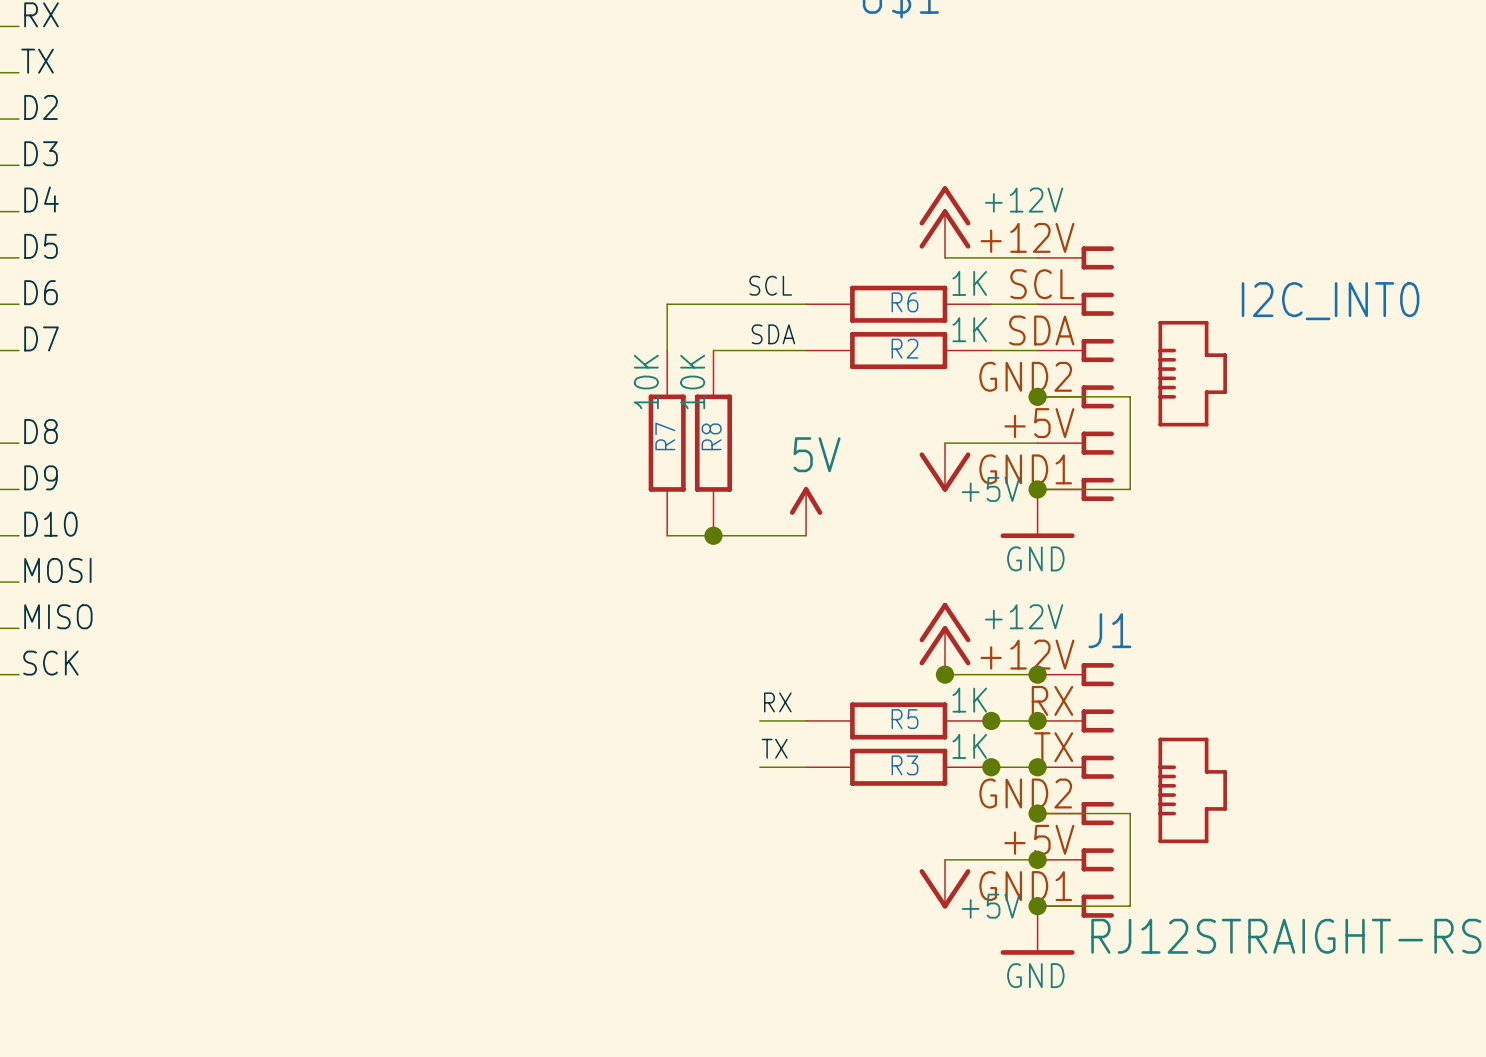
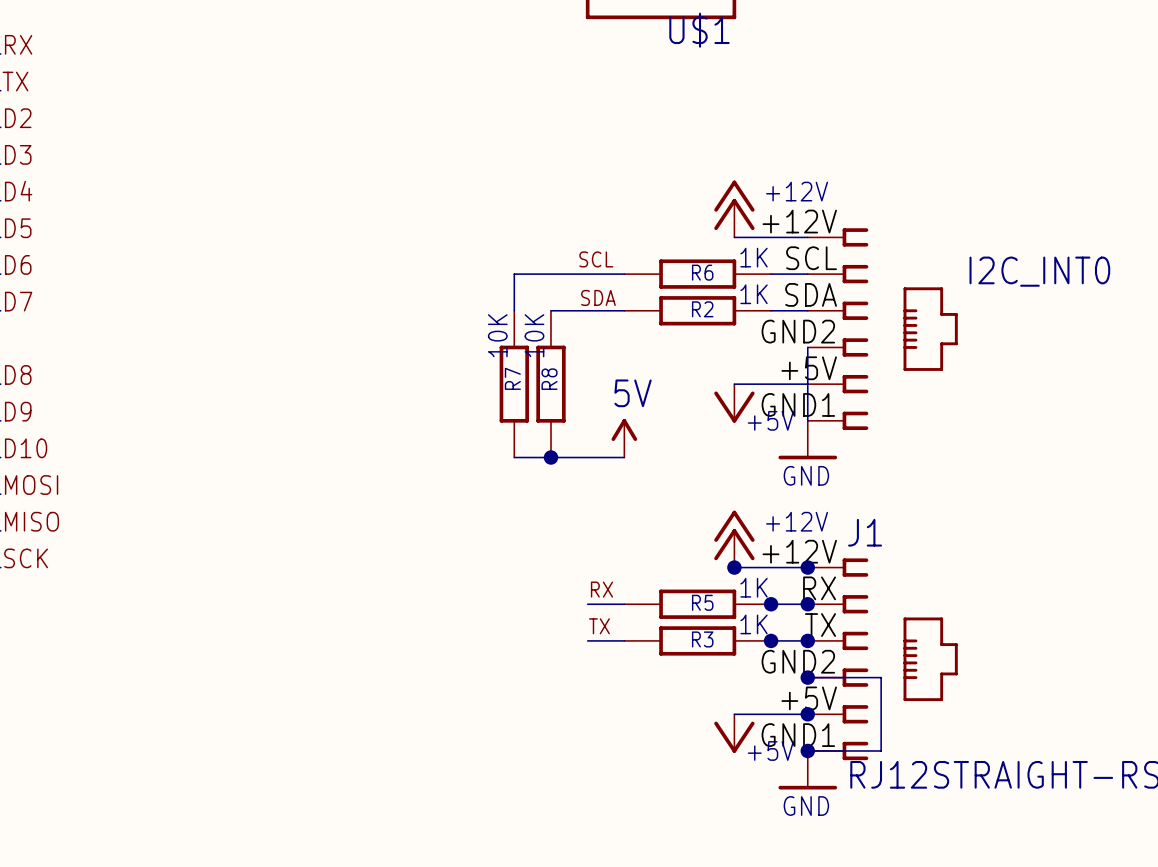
wire: (1037, 396) (1130, 396) (1130, 489) (1037, 489) -> (807, 347) (807, 420)
junction: (1037, 396) -> none
junction: (1037, 489) -> none

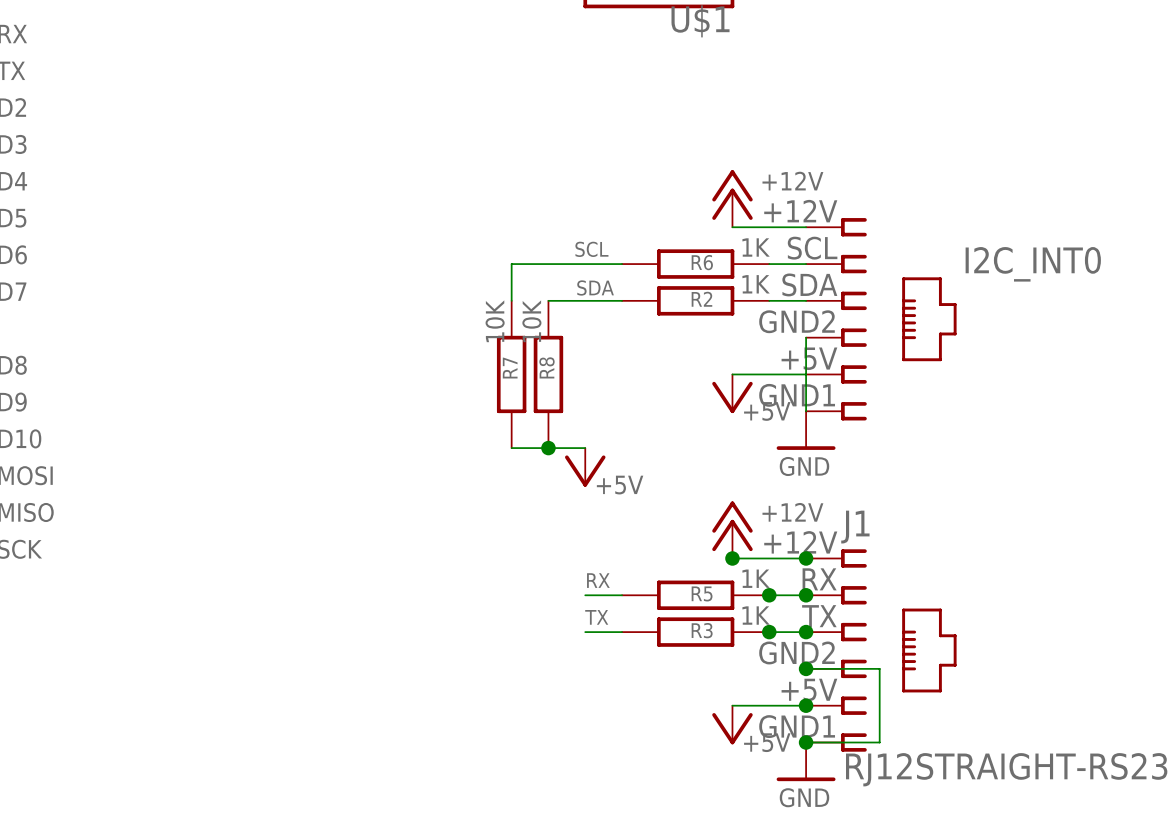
power symbol: 5V (624, 438) -> none
wire: (587, 457) (624, 457) -> none
power symbol: none -> +5V (585, 467)

